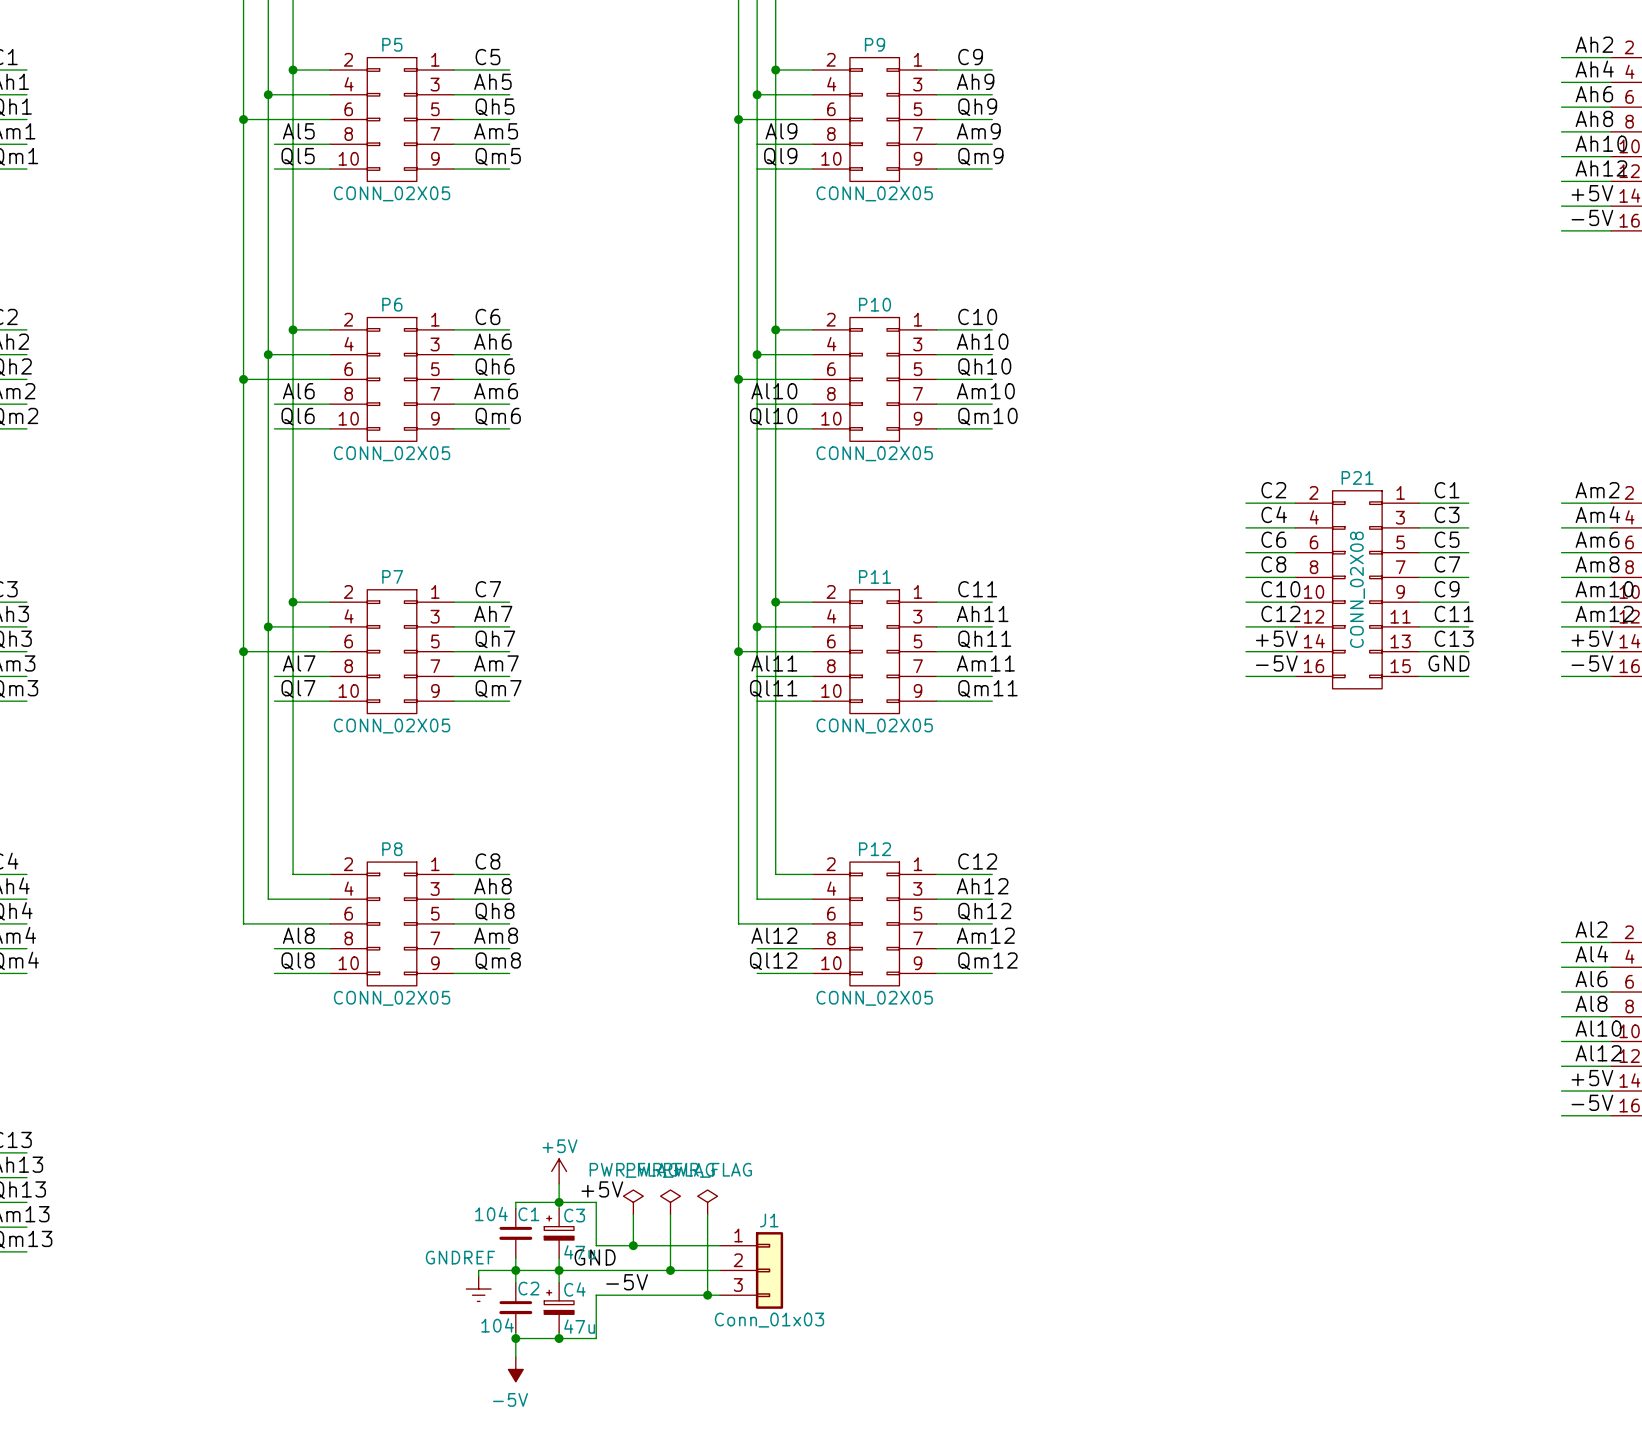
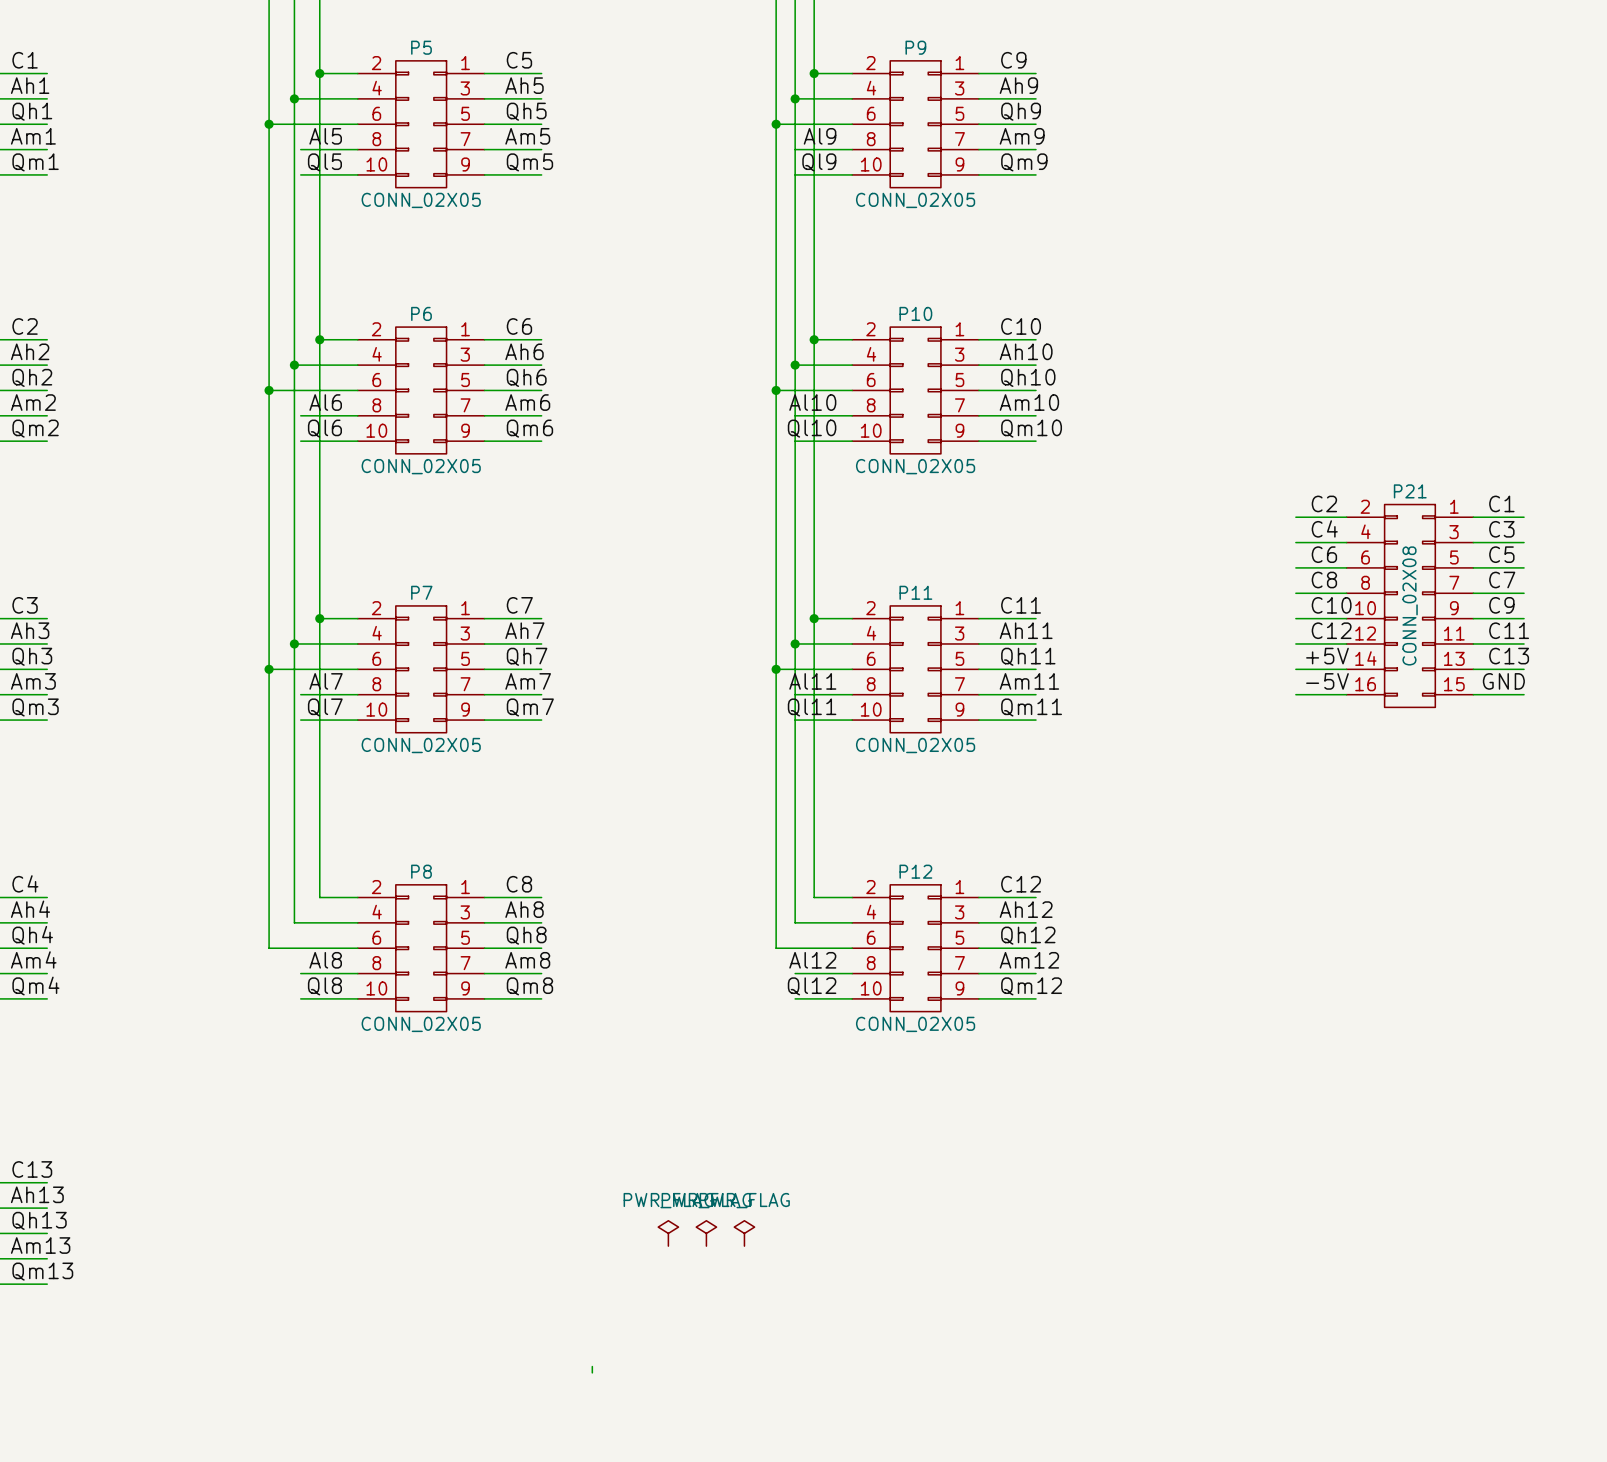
power symbol: +5V (559, 1171) -> none
wire: (559, 1183) (559, 1208) -> none
label: +5V (602, 1189) -> none
junction: (559, 1202) -> none
wire: (515, 1208) (515, 1202) (596, 1202) (596, 1245) (720, 1245) -> none
wire: (633, 1214) (633, 1245) -> none
wire: (670, 1214) (670, 1270) -> none
wire: (707, 1214) (707, 1295) -> none
C1: 104 (515, 1233) -> none
C3: 47u (559, 1233) -> none
junction: (633, 1245) -> none
label: GND (595, 1257) -> none
wire: (515, 1258) (515, 1282) -> none
wire: (559, 1258) (559, 1282) -> none
junction: (515, 1270) -> none
junction: (559, 1270) -> none
junction: (670, 1270) -> none
wire: (720, 1270) (478, 1270) (478, 1276) -> none
J1: Conn_01x03 (751, 1270) -> none
label: -5V (627, 1282) -> none
power symbol: GNDREF (478, 1289) -> none
junction: (707, 1295) -> none
wire: (720, 1295) (596, 1295) (596, 1338) (515, 1338) -> none
C2: 104 (515, 1307) -> none
C4: 47u (559, 1307) -> none
wire: (515, 1332) (515, 1357) -> none
junction: (515, 1338) -> none
junction: (559, 1338) -> none
power symbol: -5V (515, 1369) -> none

